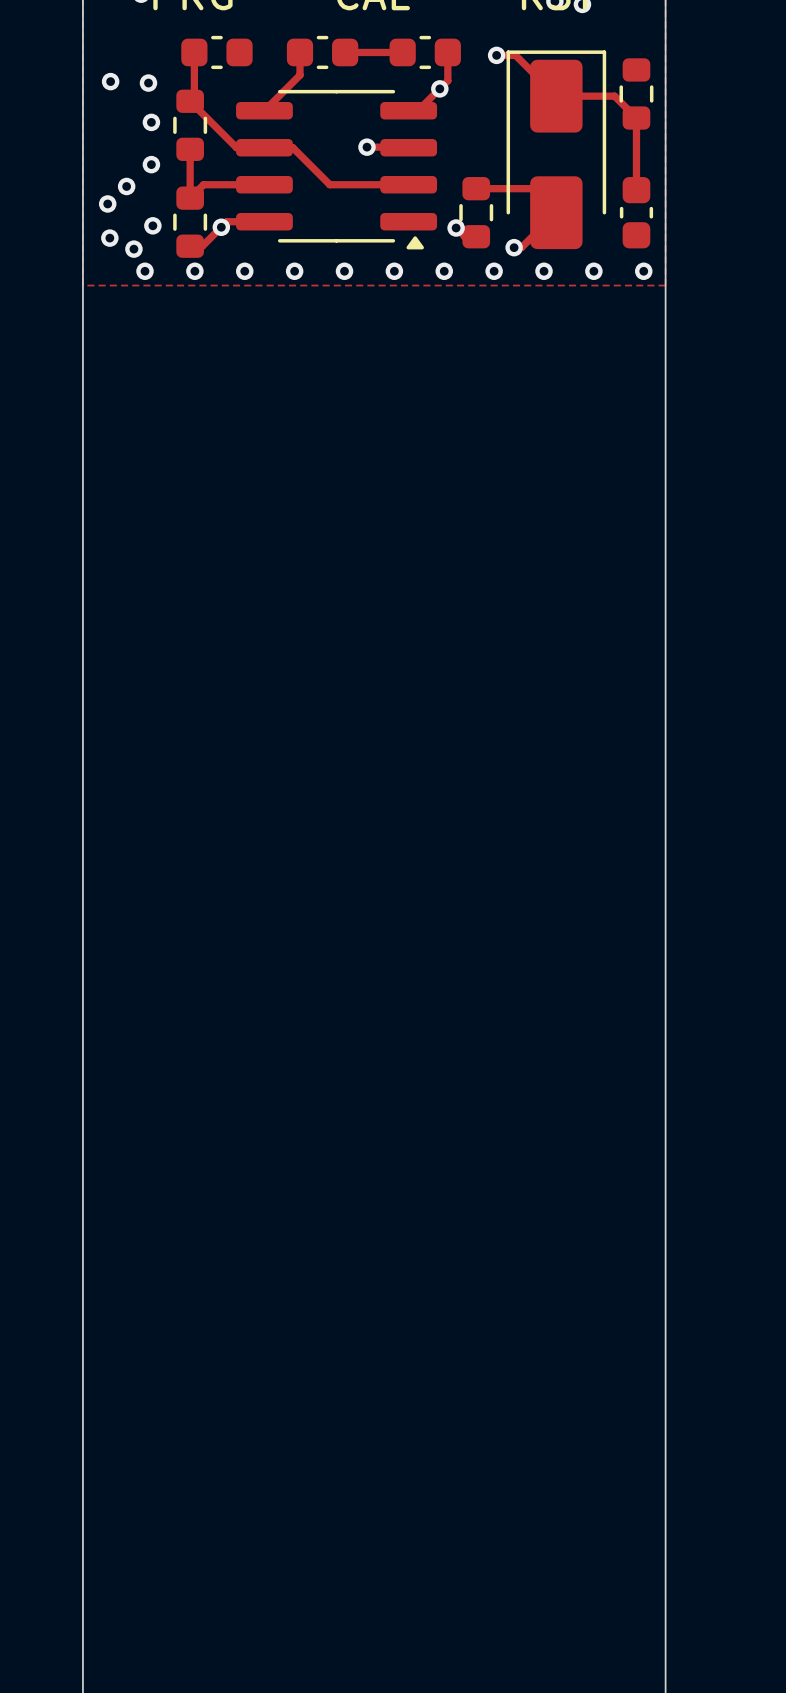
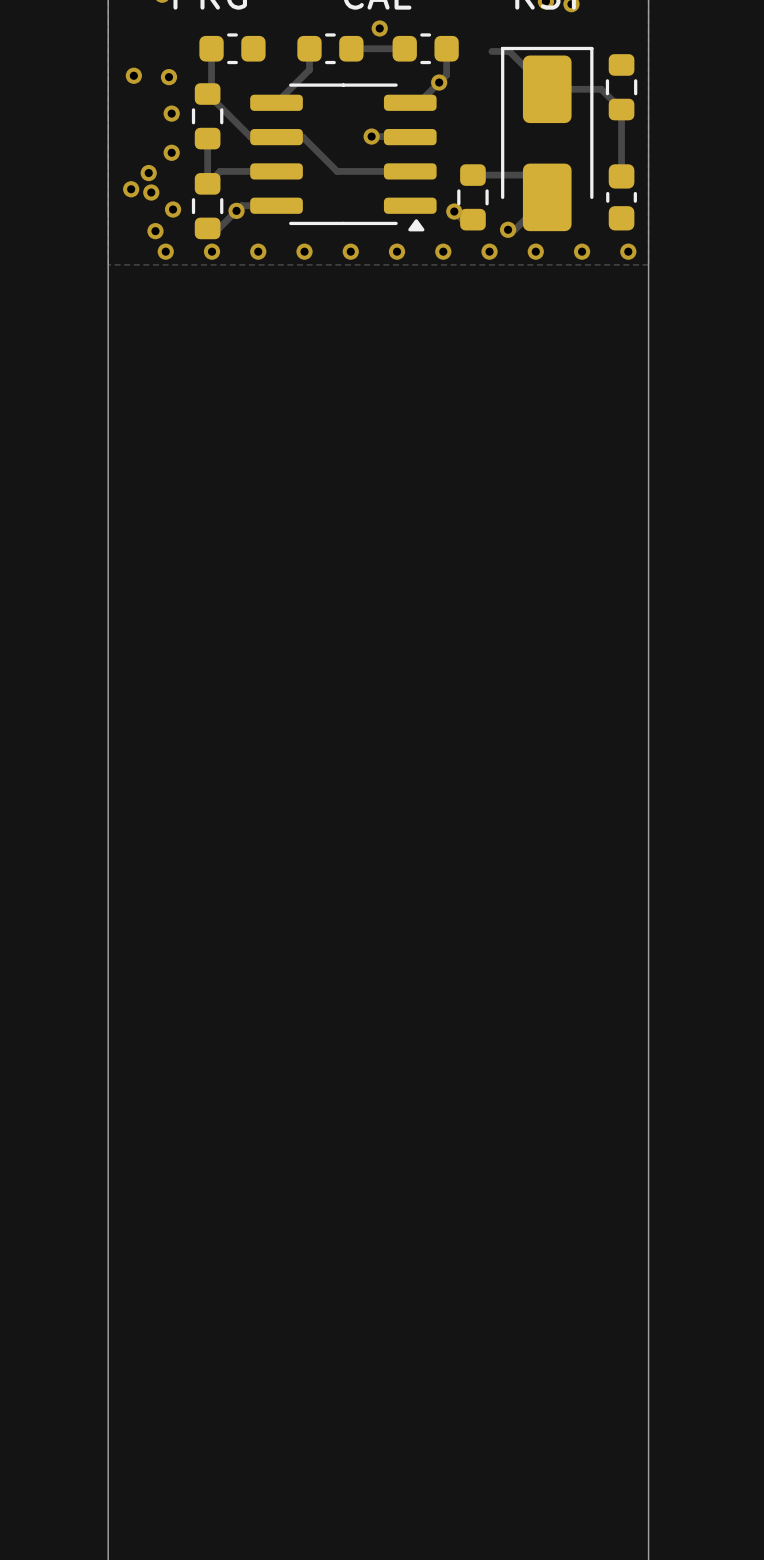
via position: (496, 55) -> (379, 28)
via position: (109, 238) -> (151, 192)

